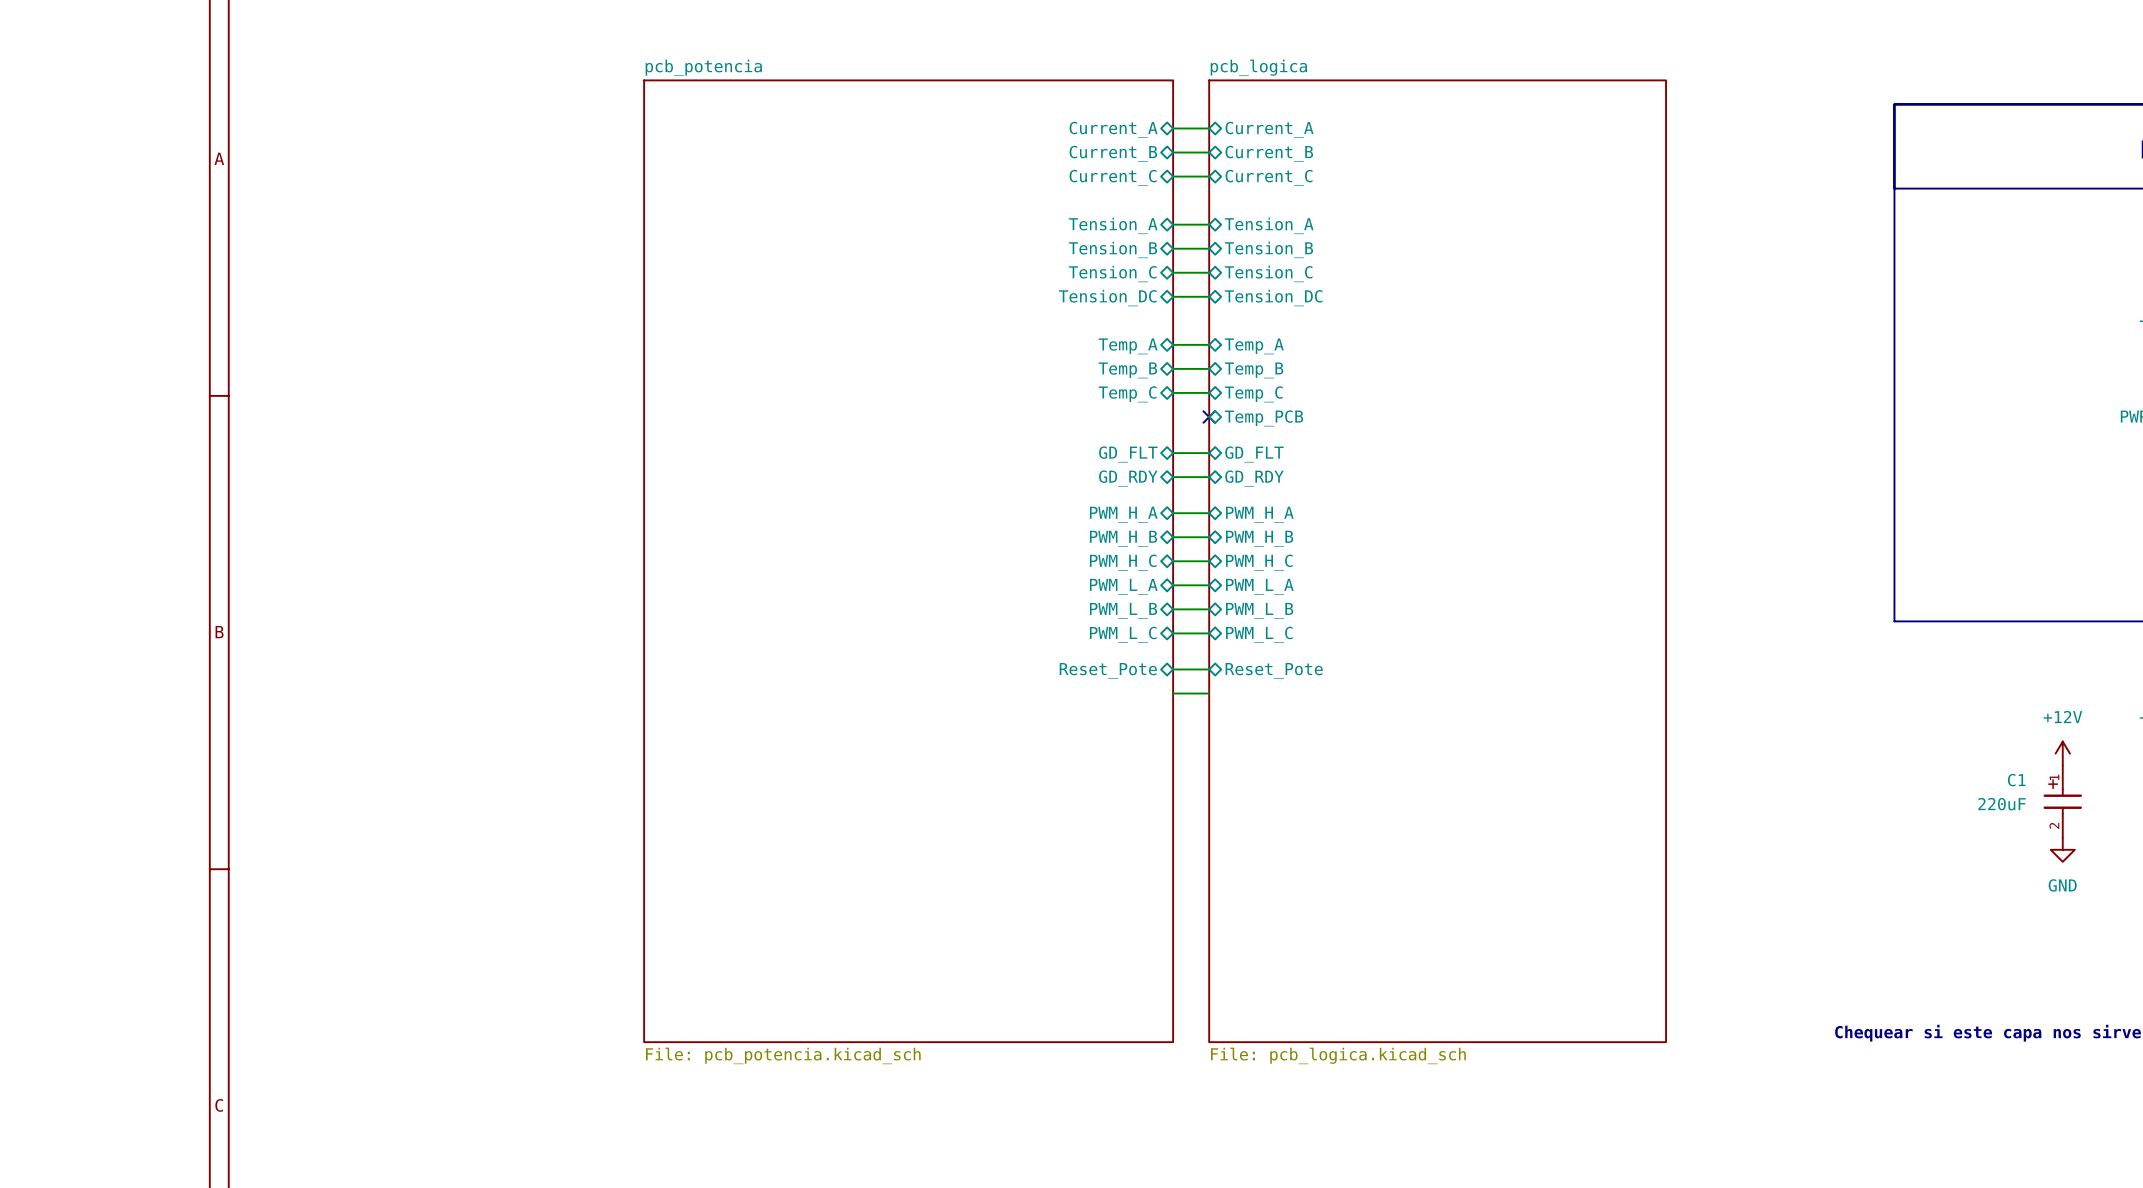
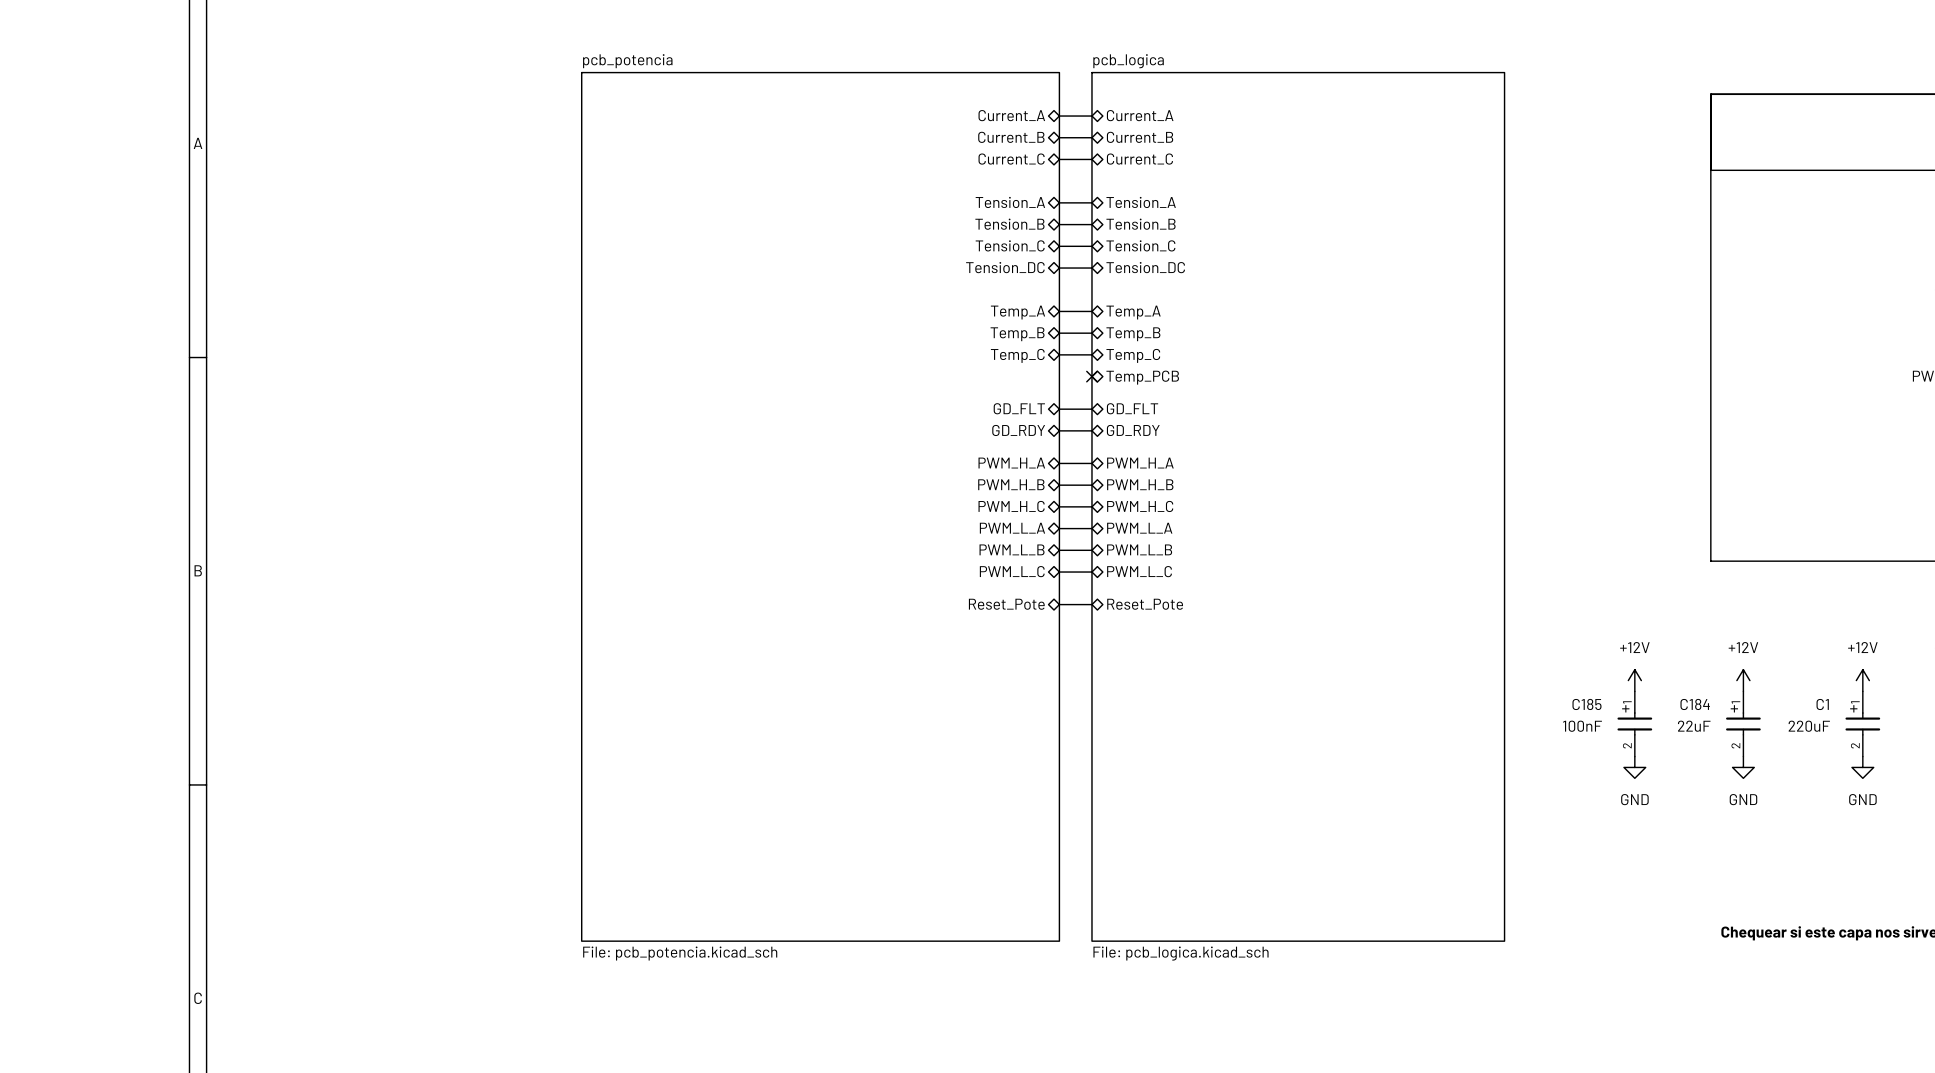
wire: (1173, 693) (1209, 693) -> none
power symbol: none -> +12V (1634, 680)
power symbol: none -> +12V (1743, 680)
C185: none -> 100nF (1634, 724)
C184: none -> 22uF (1743, 724)
power symbol: none -> GND (1634, 767)
power symbol: none -> GND (1743, 767)

